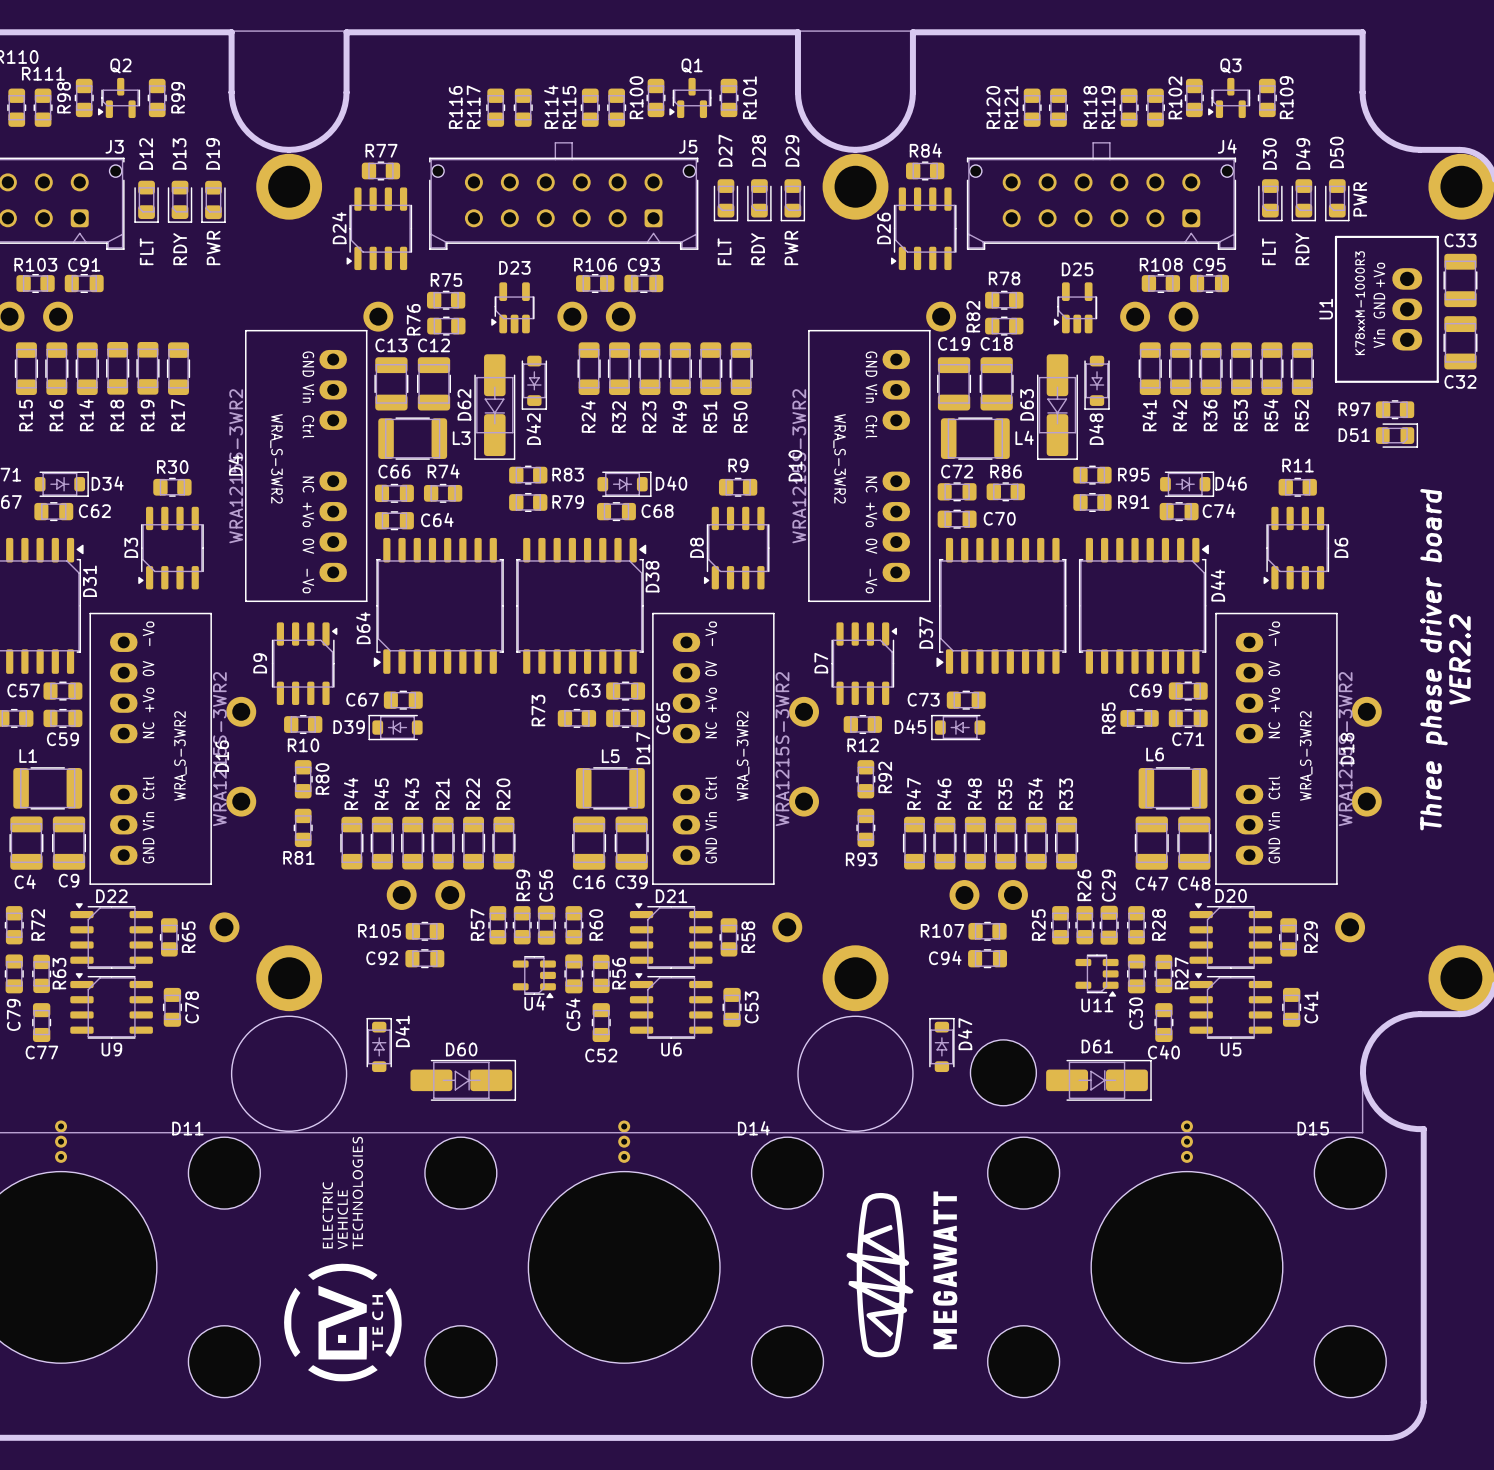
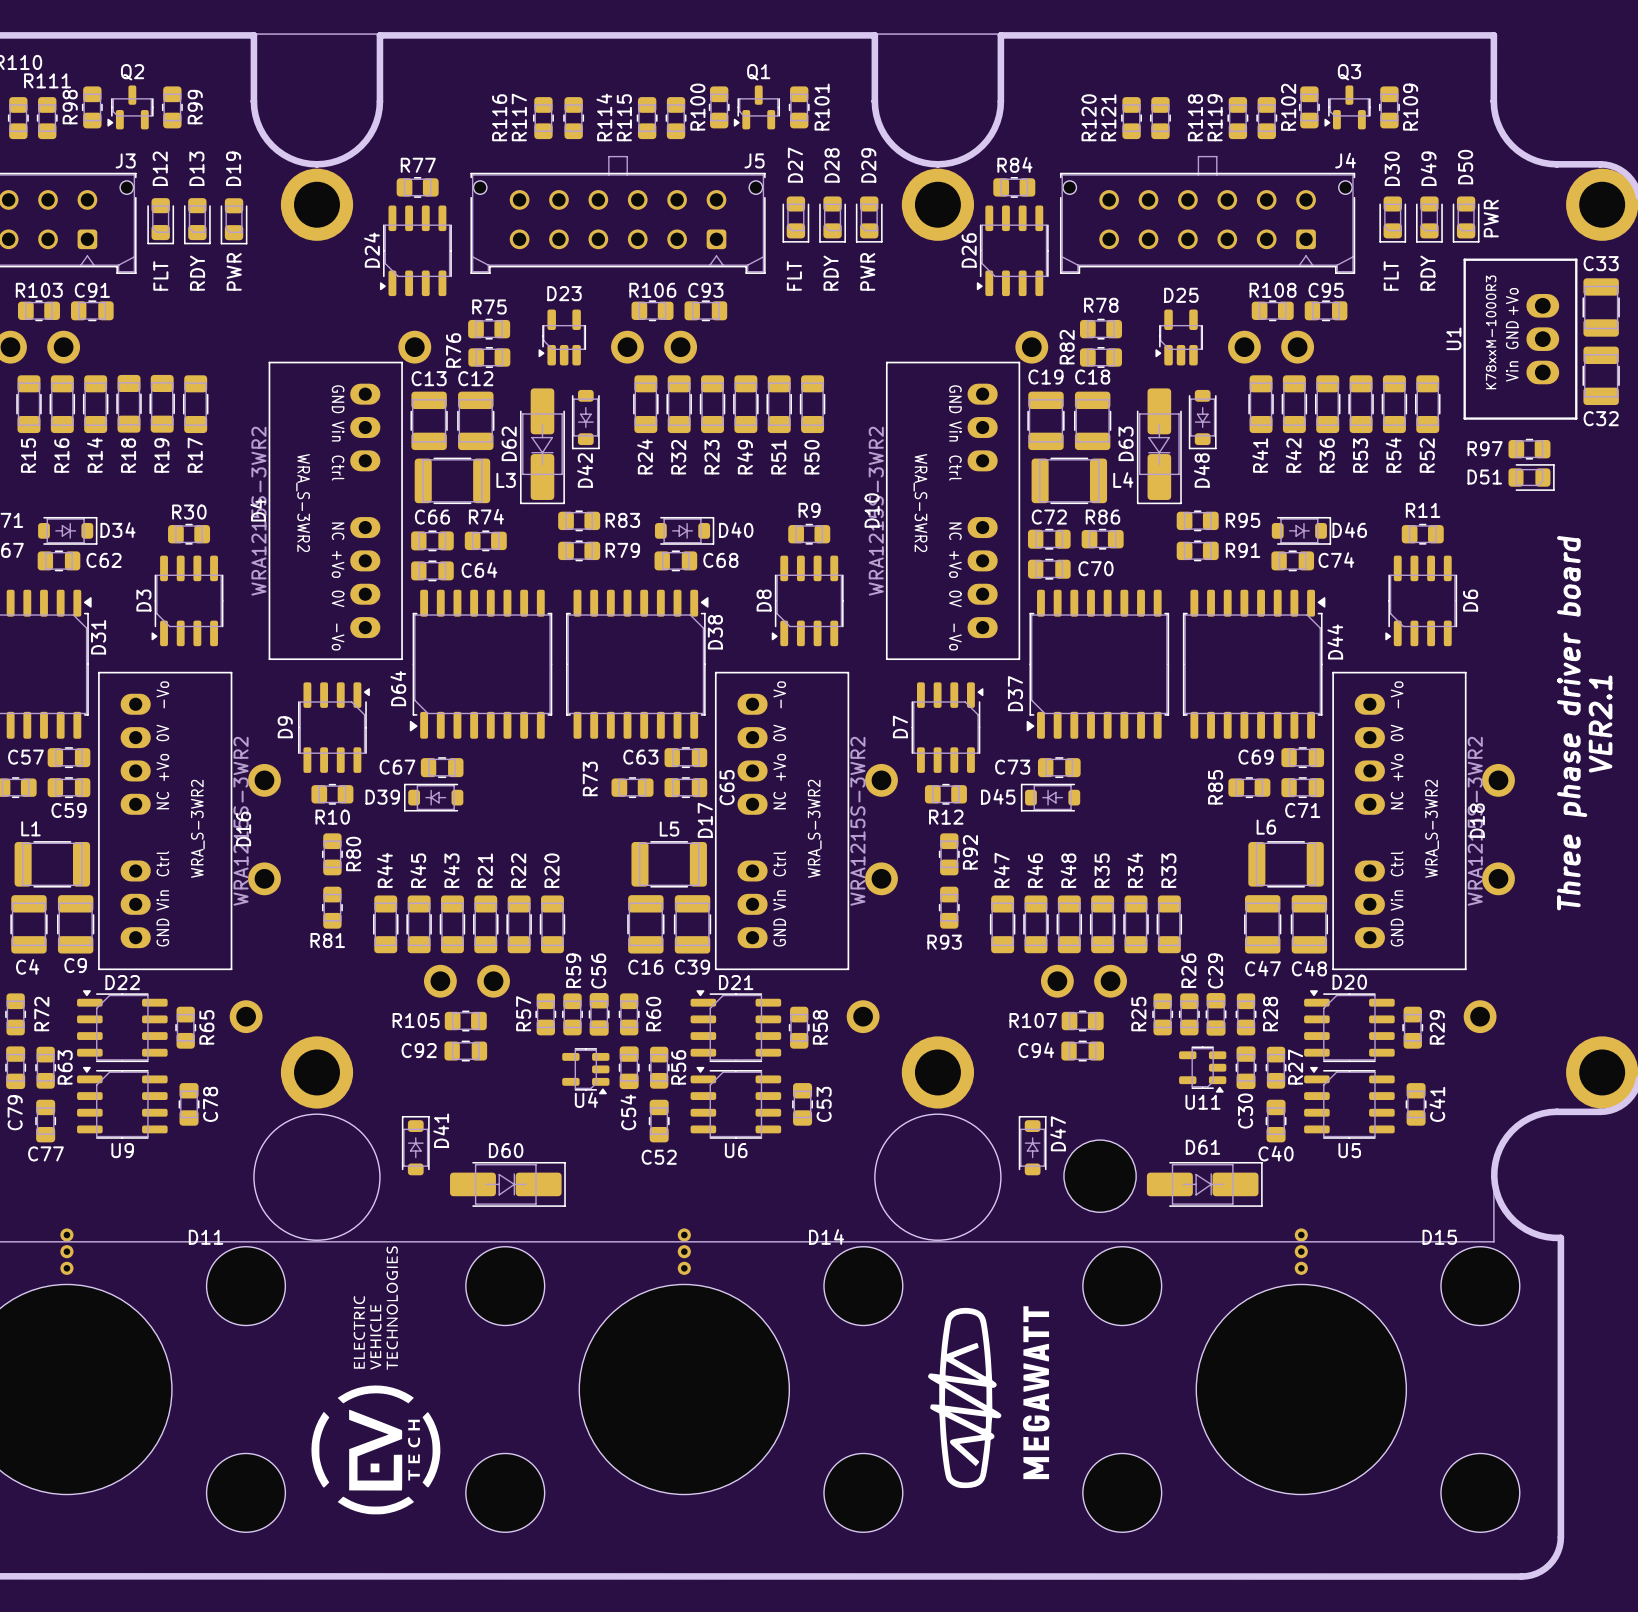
text: VER2.2 (1459, 659) -> VER2.1 (1600, 723)

